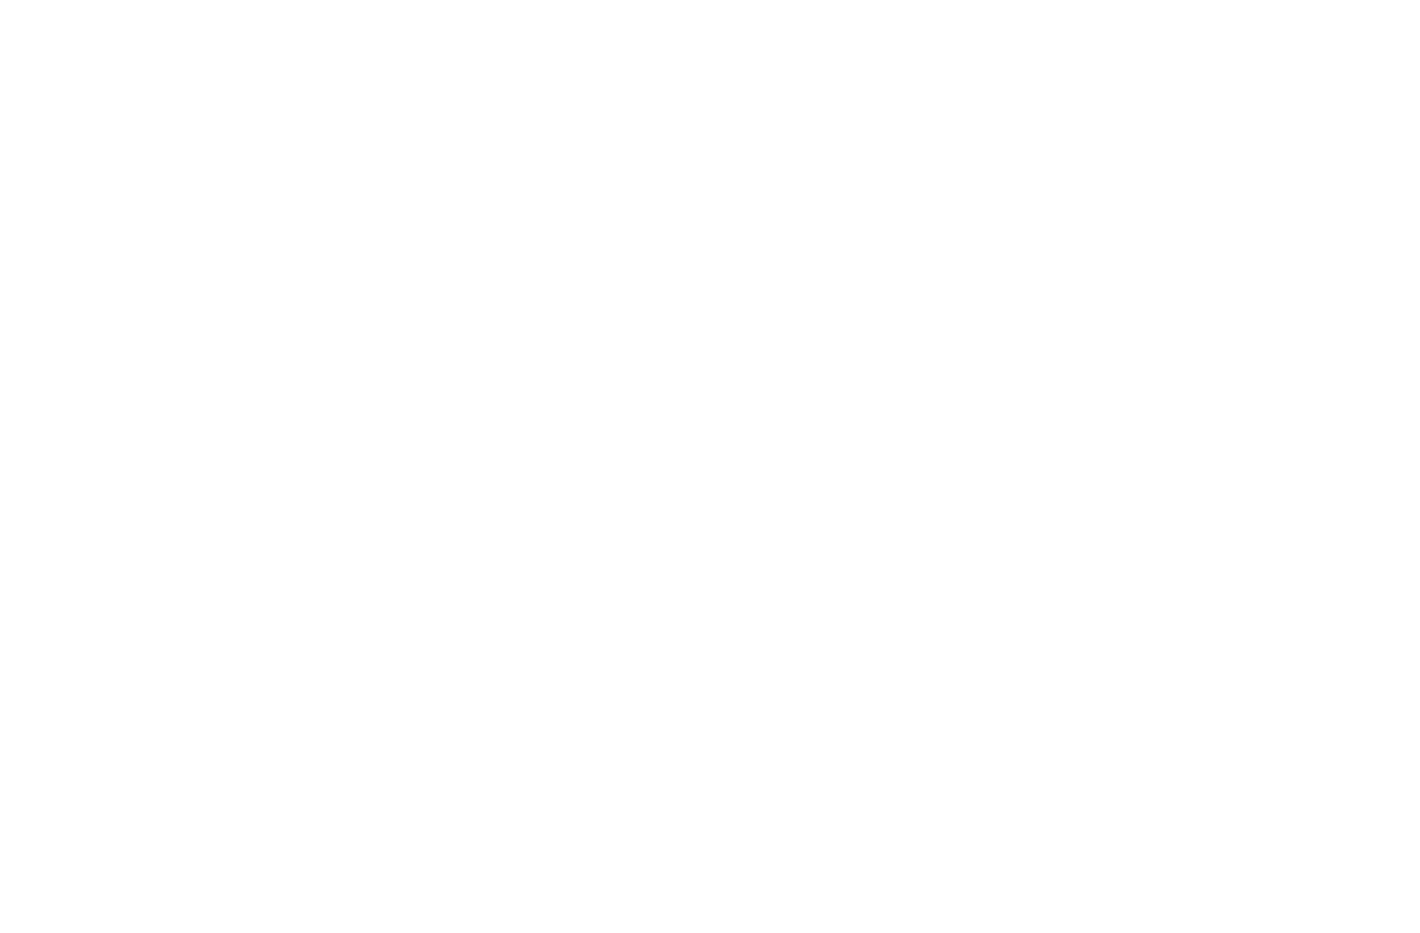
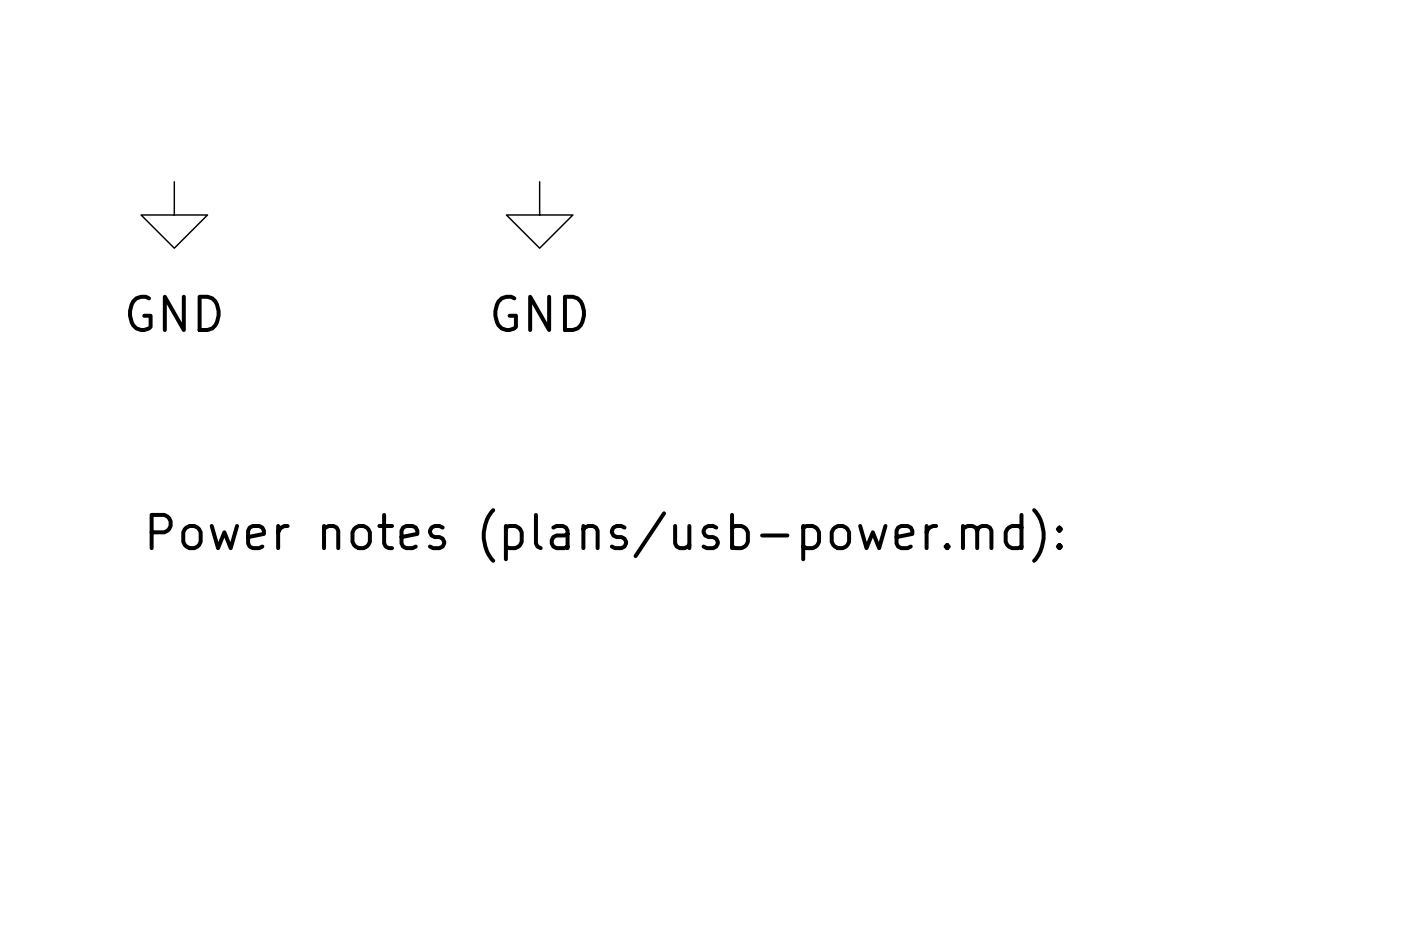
power symbol: none -> GND (174, 214)
power symbol: none -> GND (539, 214)
text: none -> Power notes (plans/usb-power.md): (606, 535)

